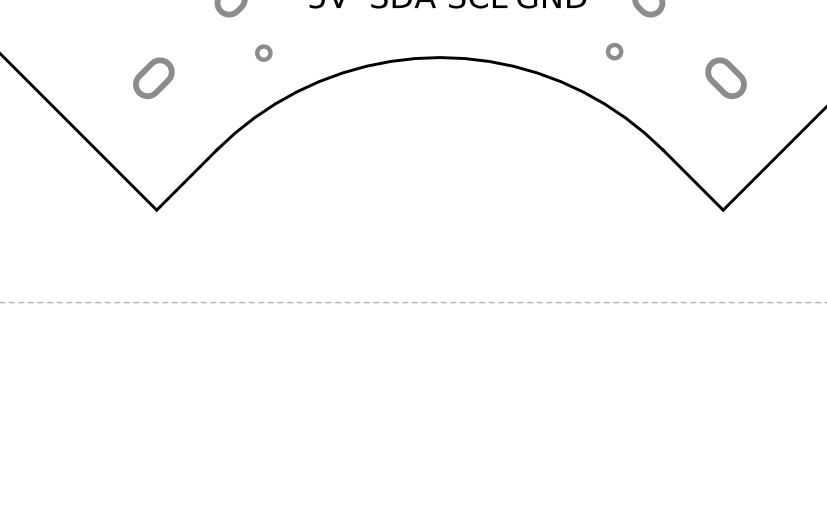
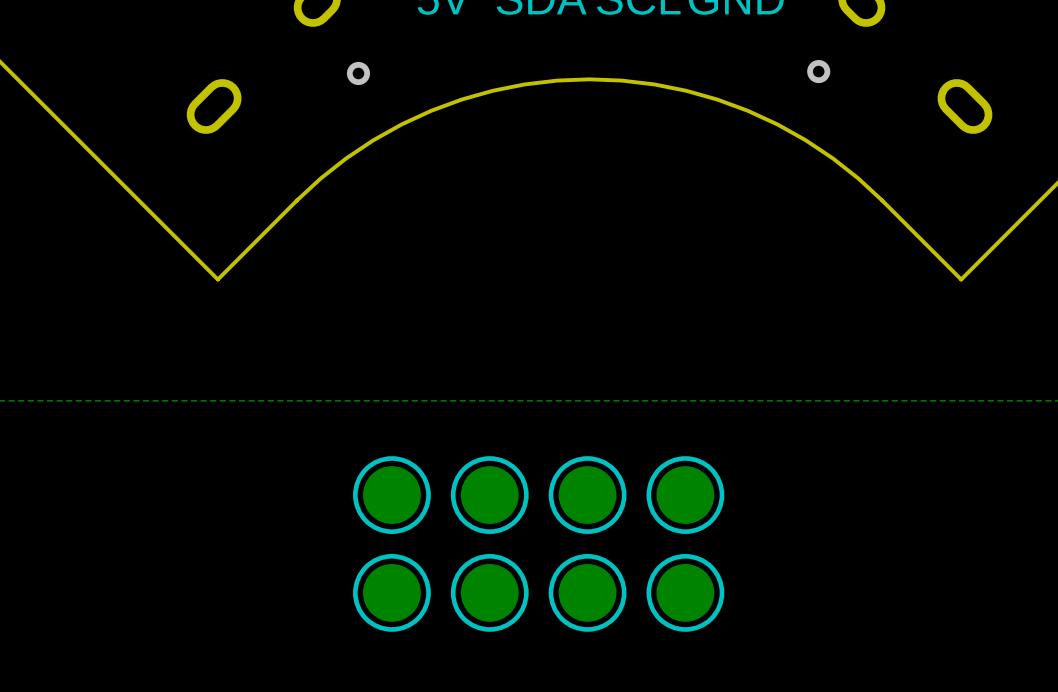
part: none -> (538, 495)
part: none -> (538, 592)

